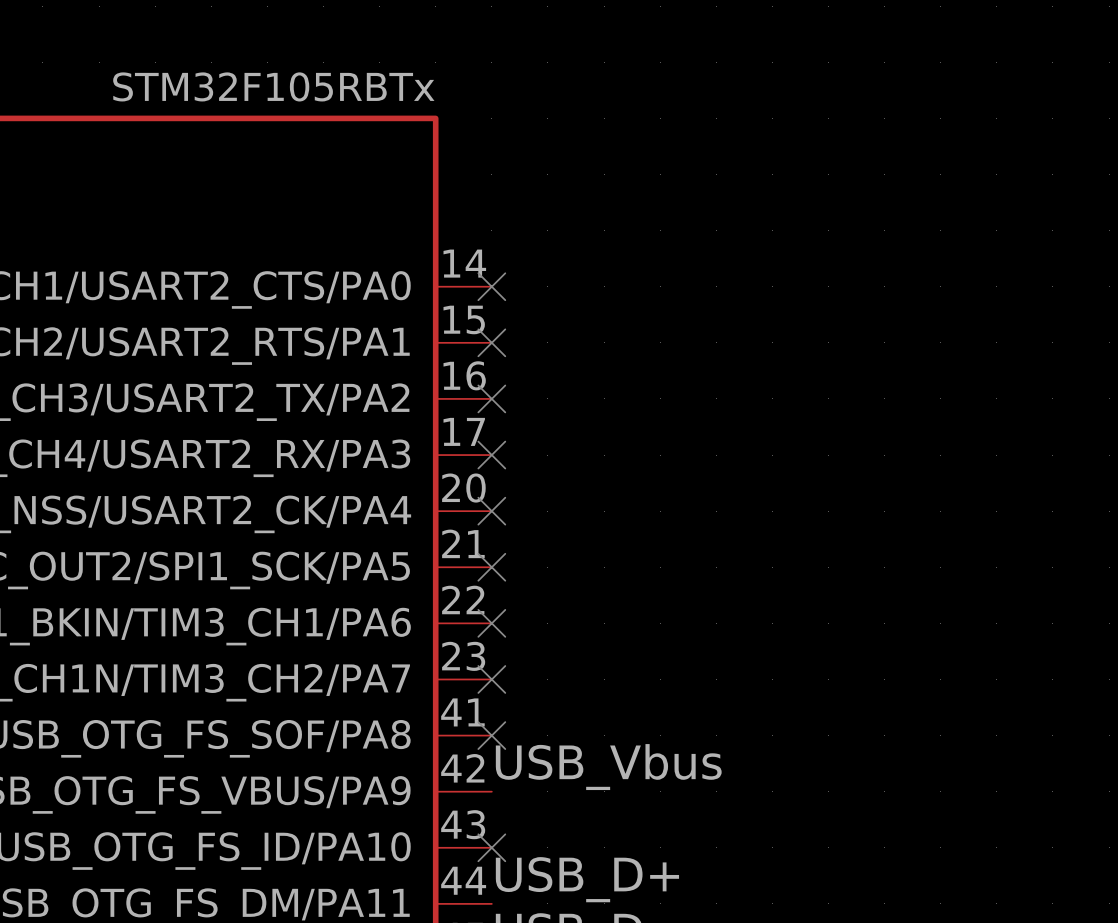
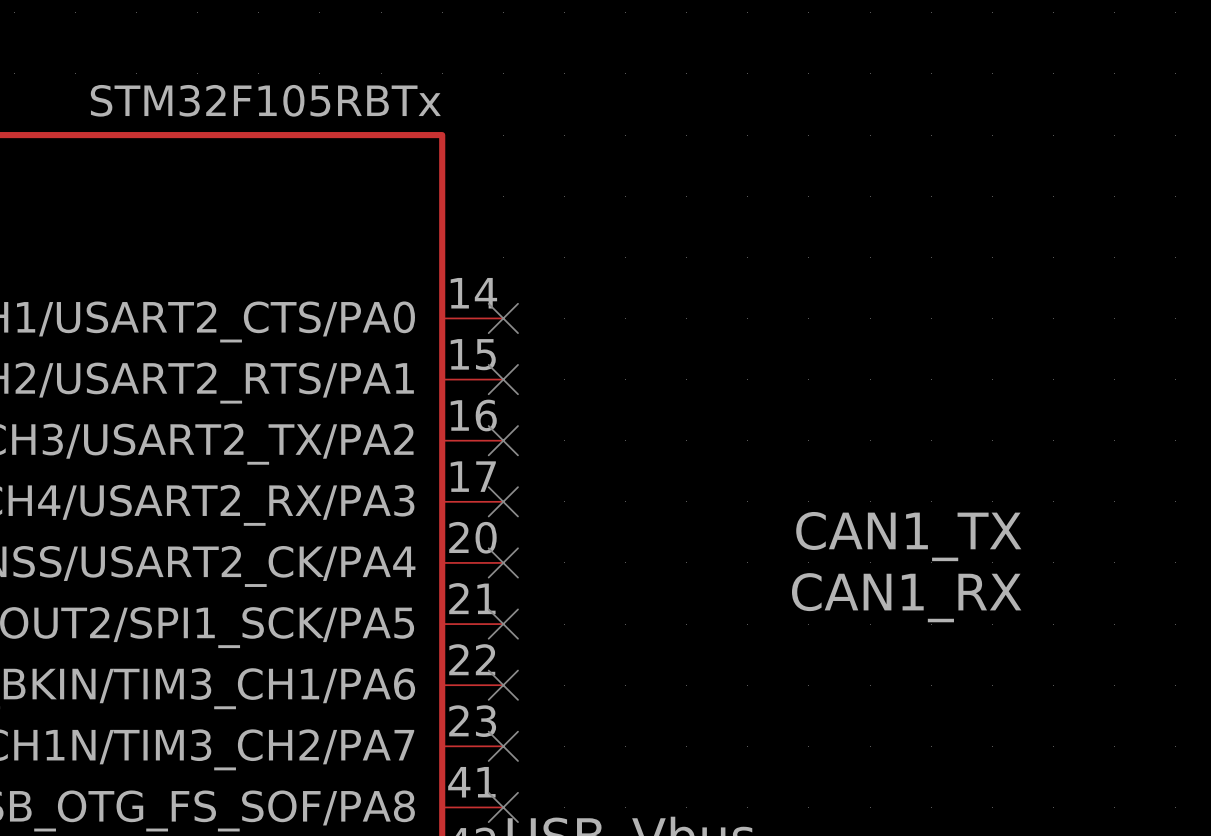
label: none -> CAN1_TX (908, 536)
label: none -> CAN1_RX (906, 597)

